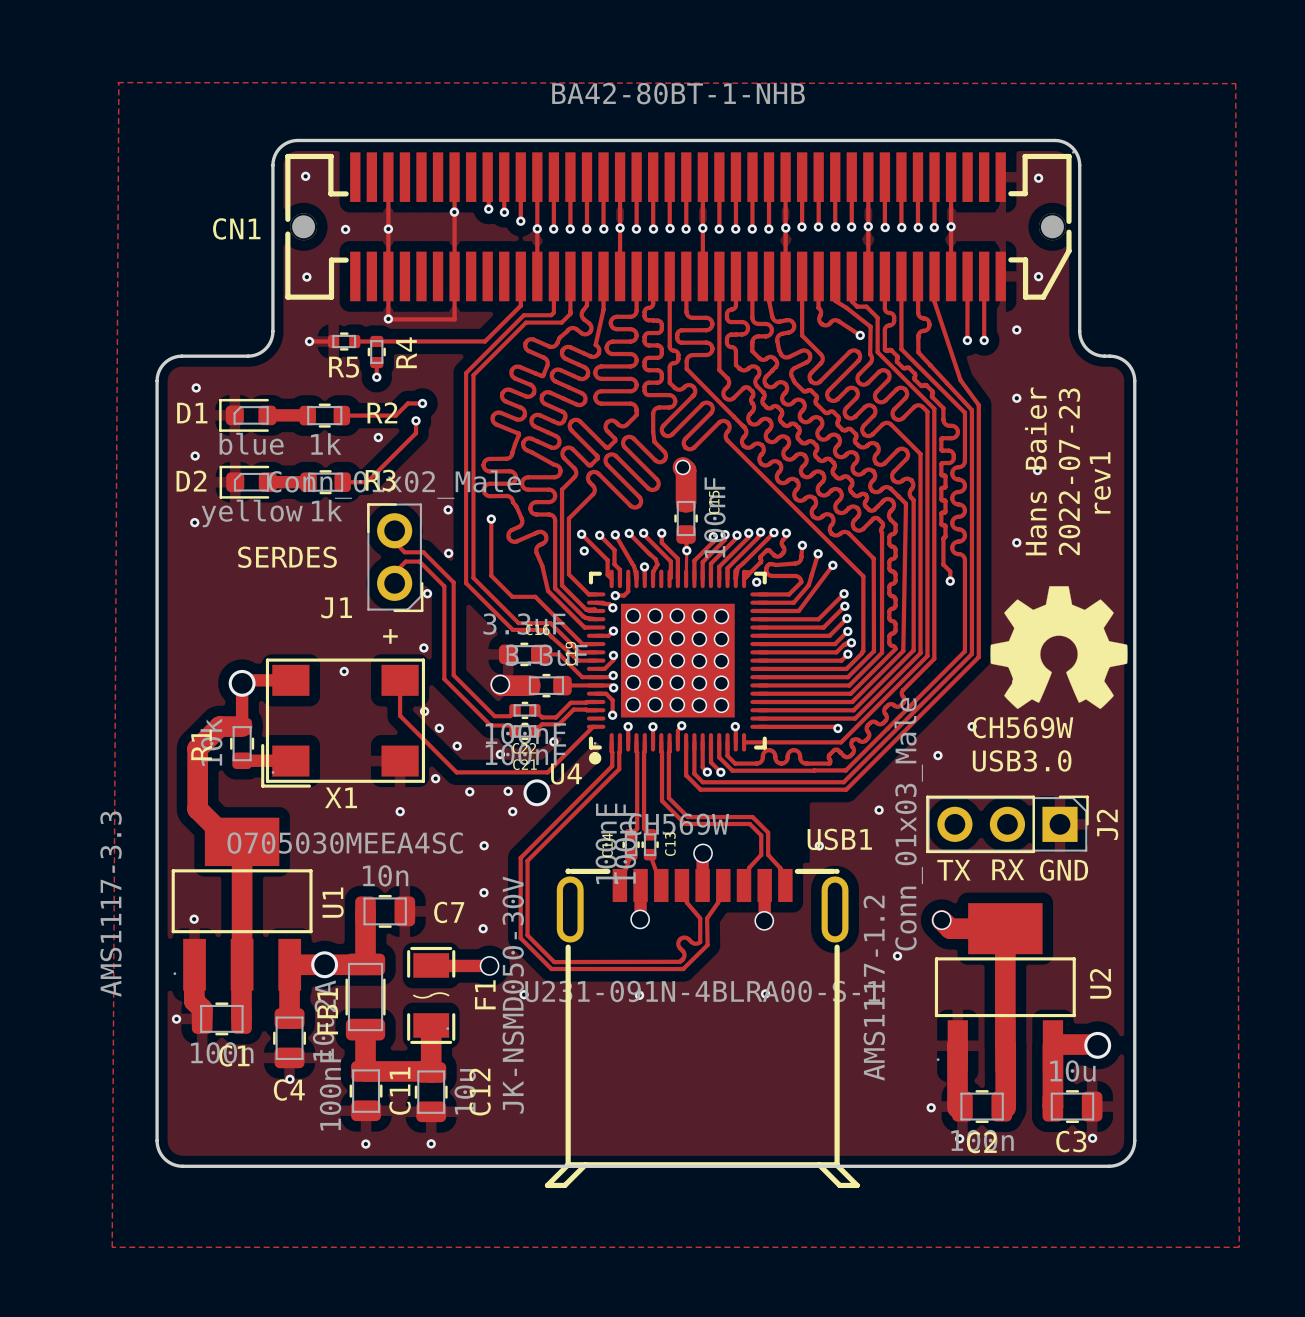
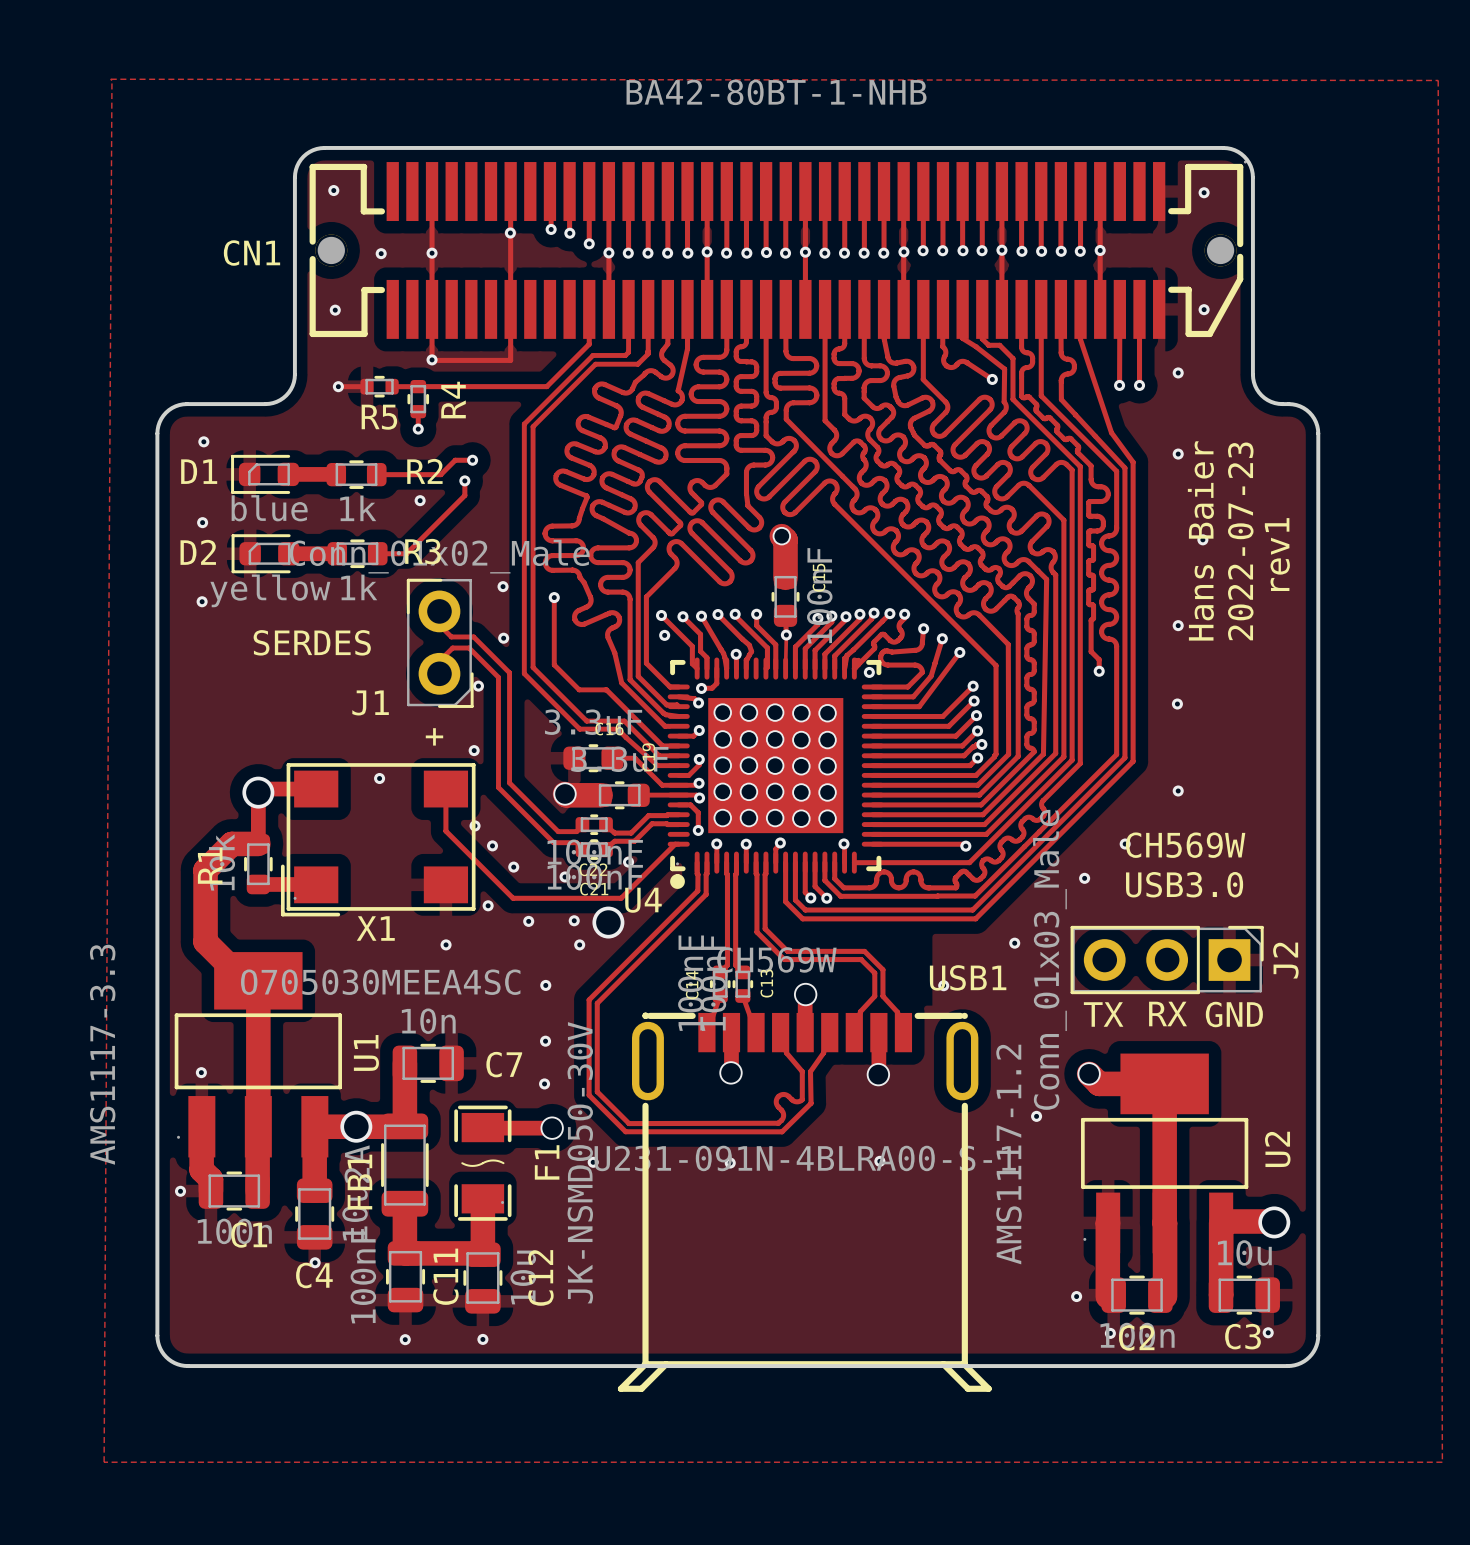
drawing: [990, 586, 1128, 709] -> none

